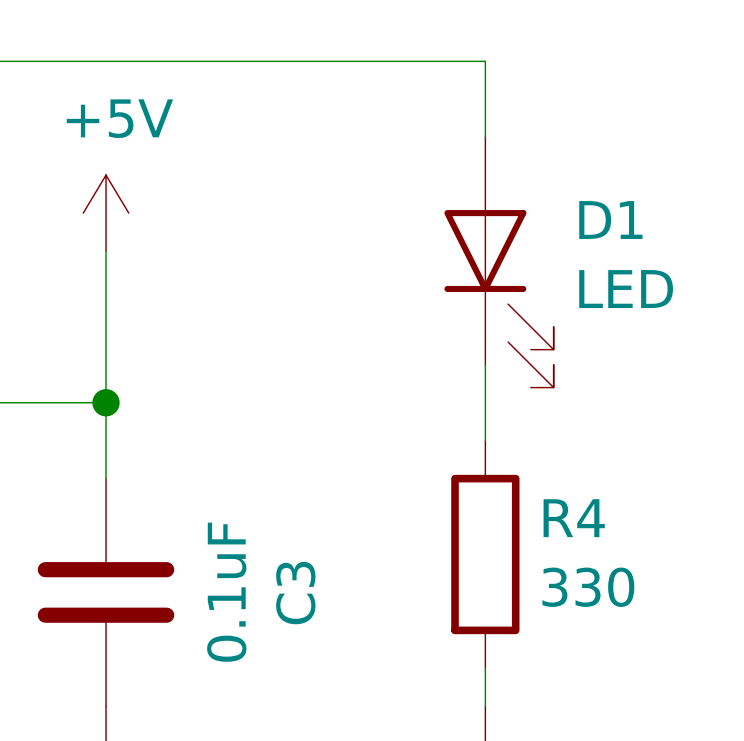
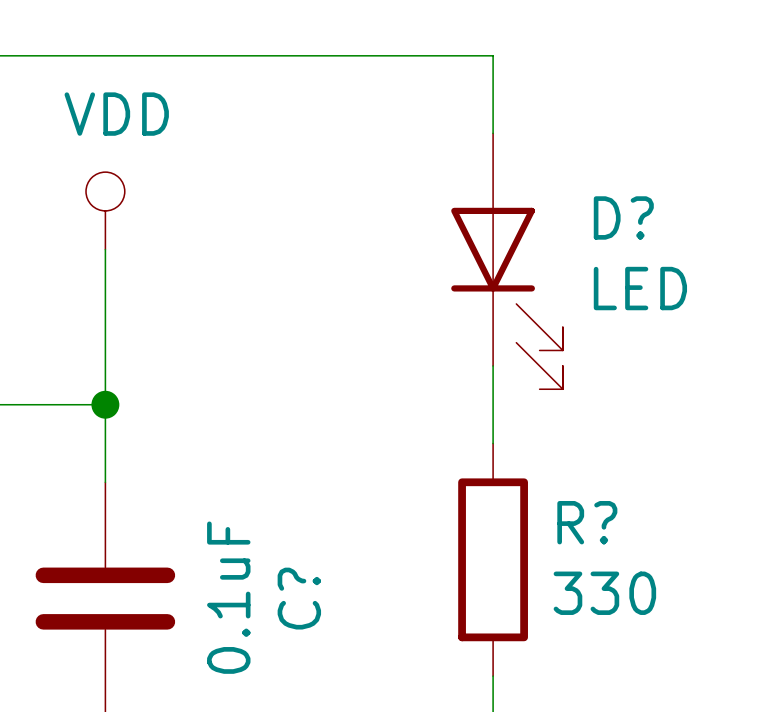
power symbol: +5V (106, 213) -> VDD (105, 210)
D1 name: D1 (610, 220) -> D? (623, 217)
R4 name: R4 (574, 518) -> R? (587, 522)
C3 name: C3 (295, 593) -> C? (299, 598)

